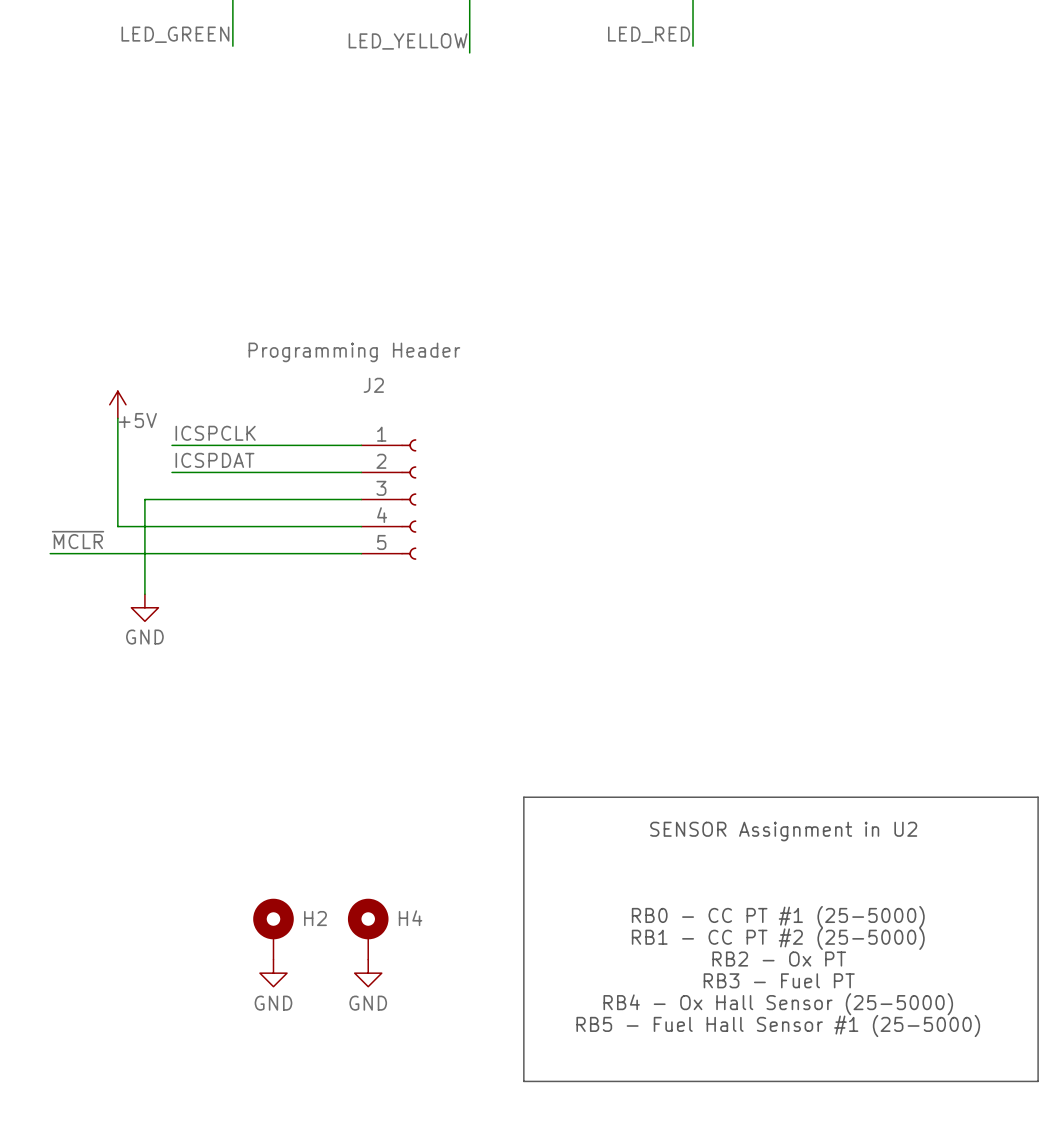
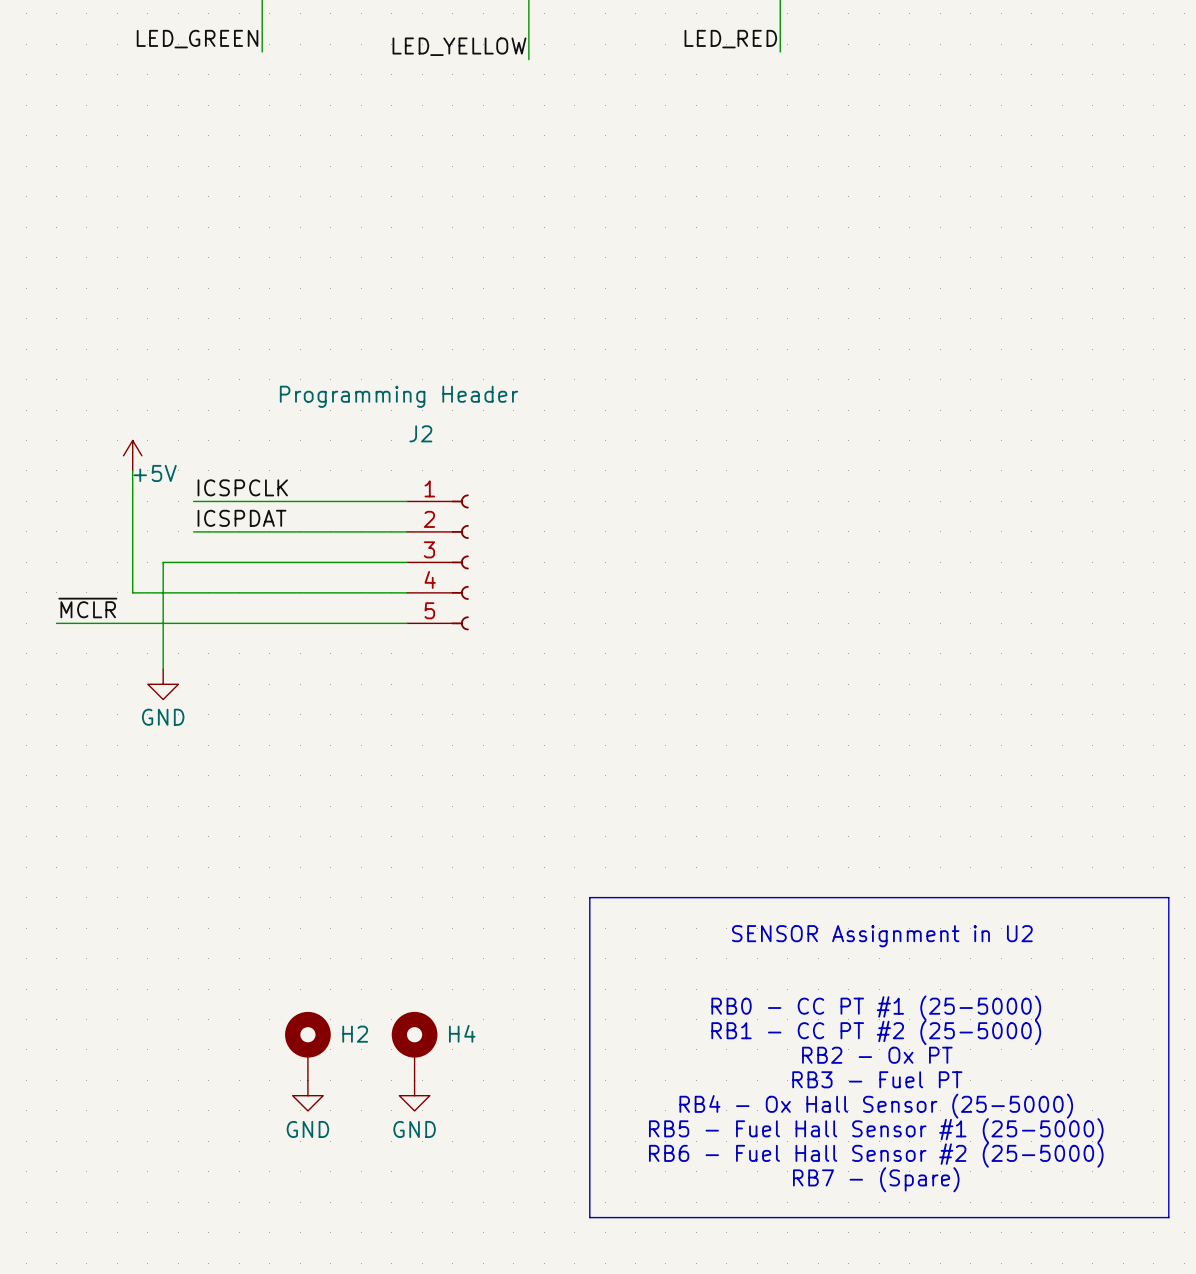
text: none -> RB0 - CC PT #1 (25-5000) (876, 1008)
text: RB0 - CC PT #1 (25-5000) (778, 917) -> RB1 - CC PT #2 (25-5000) (876, 1032)
text: RB1 - CC PT #2 (25-5000) (778, 938) -> RB2 - Ox PT (877, 1055)
text: RB2 - Ox PT (779, 959) -> RB3 - Fuel PT (877, 1079)
text: RB3 - Fuel PT (779, 980) -> RB4 - Ox Hall Sensor (25-5000) (876, 1106)
text: RB4 - Ox Hall Sensor (25-5000) (778, 1004) -> RB5 - Fuel Hall Sensor #1 (25-5000) (876, 1130)
text: RB5 - Fuel Hall Sensor #1 (25-5000) (778, 1026) -> RB6 - Fuel Hall Sensor #2 (25-5000) (876, 1155)
text: none -> RB7 - (Spare) (876, 1179)

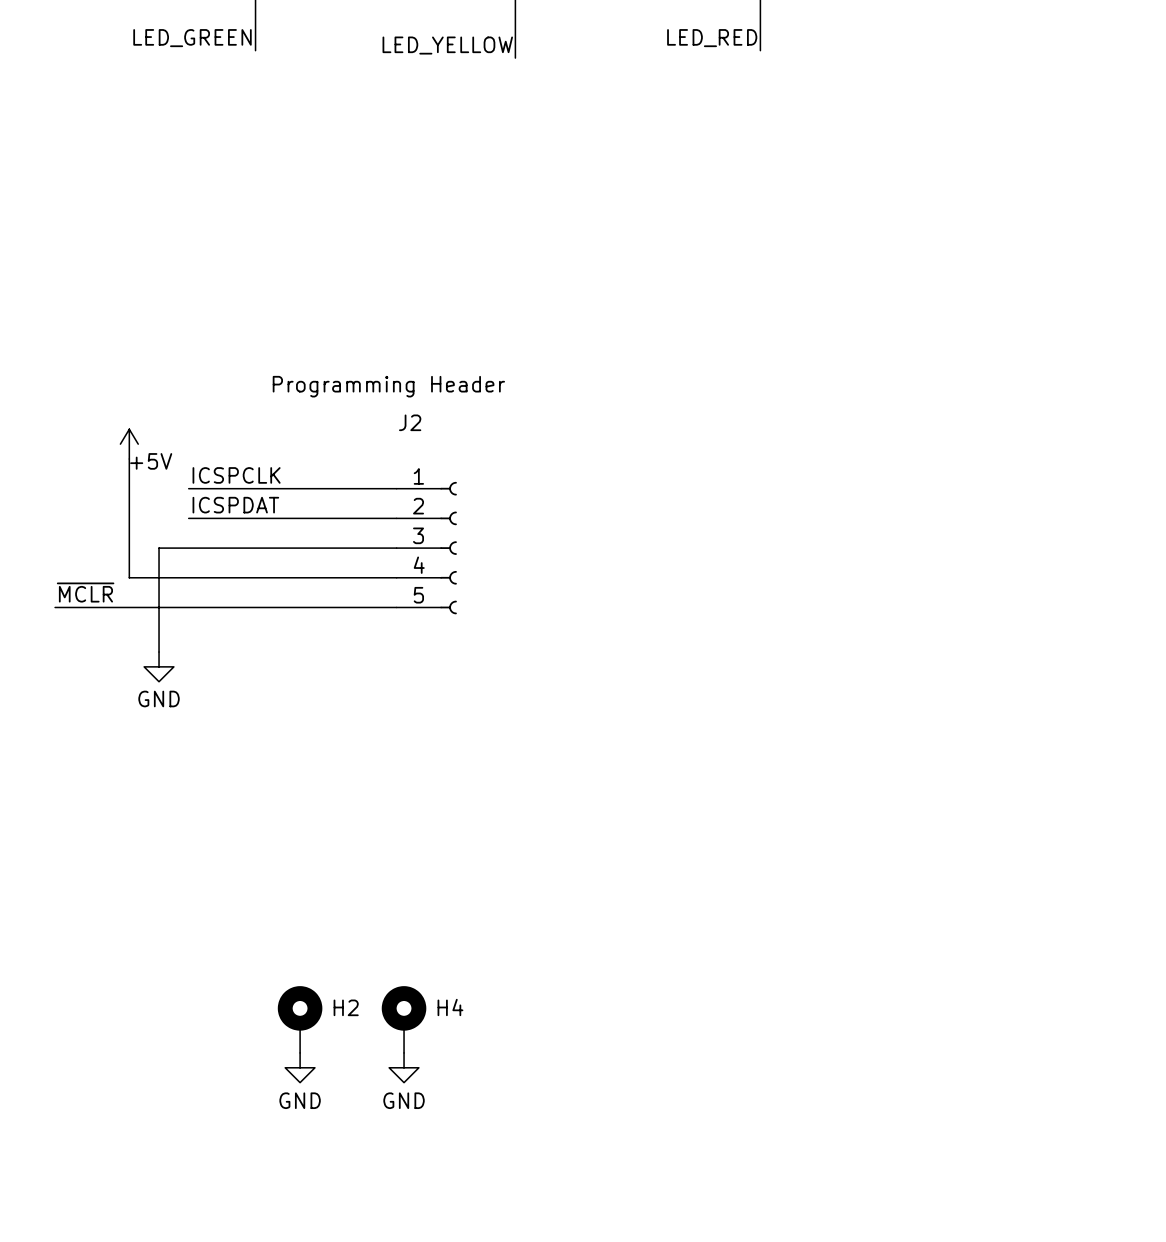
line: (589, 897) (1168, 897) (1168, 1217) (589, 1217) (589, 897) -> none
text: SENSOR Assignment in U2 (882, 936) -> none
text: RB0 - CC PT #1 (25-5000) (876, 1008) -> none
text: RB1 - CC PT #2 (25-5000) (876, 1032) -> none
text: RB2 - Ox PT (877, 1055) -> none
text: RB3 - Fuel PT (877, 1079) -> none
text: RB4 - Ox Hall Sensor (25-5000) (876, 1106) -> none
text: RB5 - Fuel Hall Sensor #1 (25-5000) (876, 1130) -> none
text: RB6 - Fuel Hall Sensor #2 (25-5000) (876, 1155) -> none
text: RB7 - (Spare) (876, 1179) -> none

